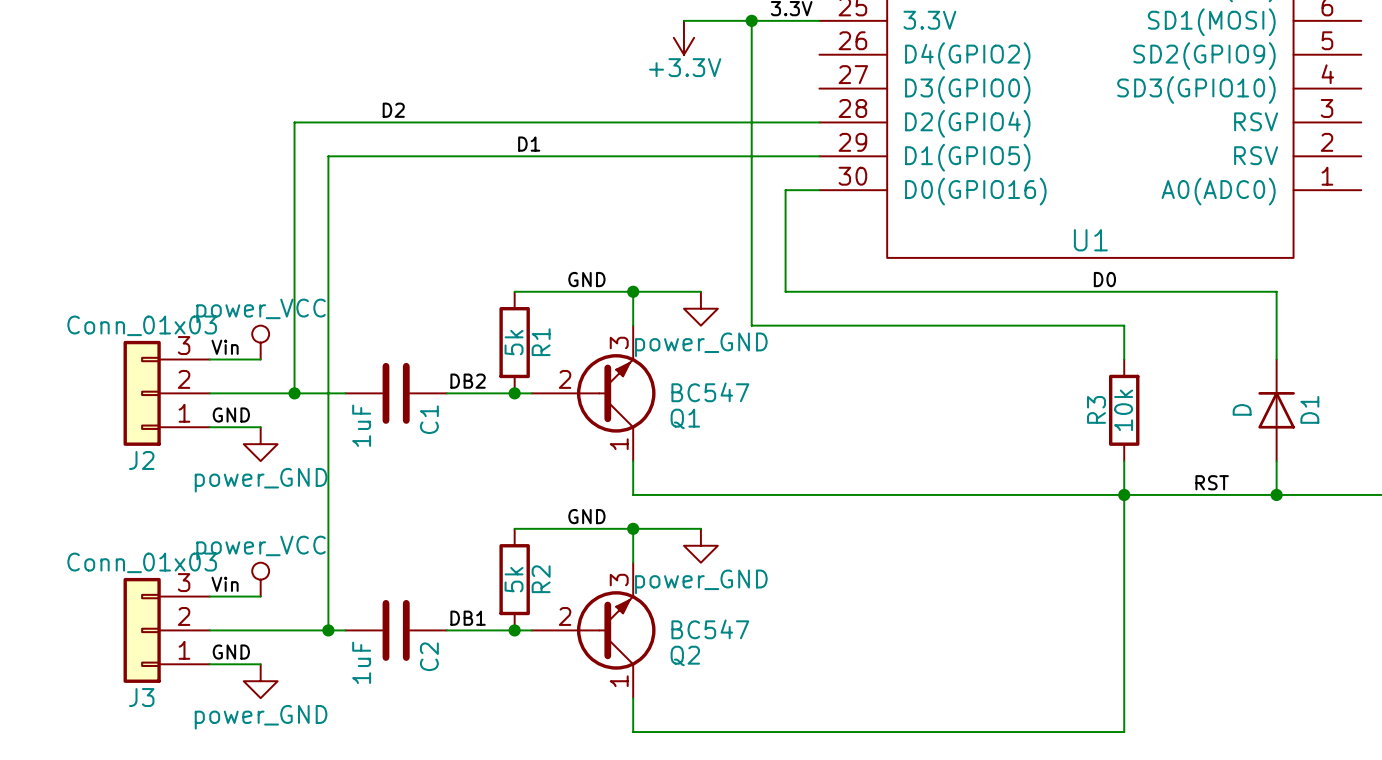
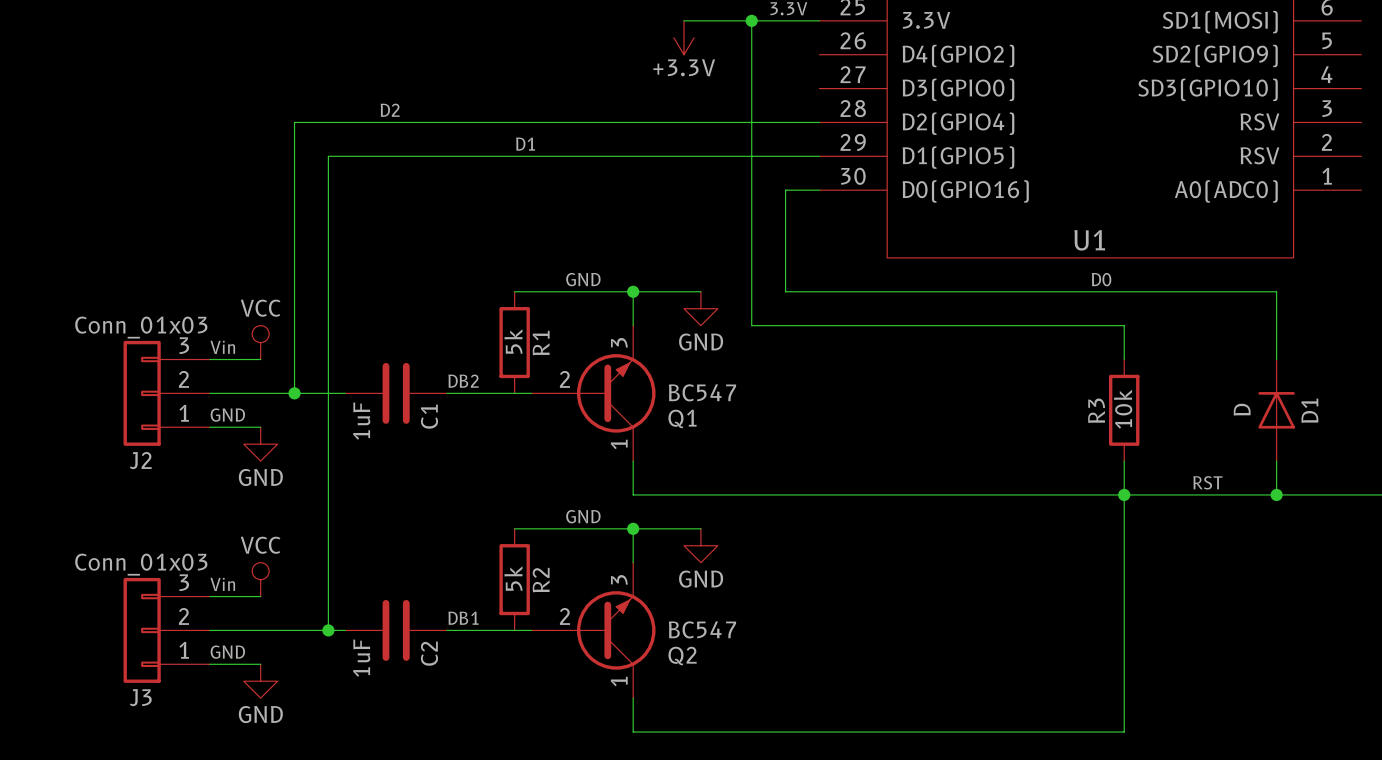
power symbol: power_GND (700, 308) -> GND (700, 308)
power symbol: power_VCC (260, 342) -> VCC (260, 342)
junction: (514, 393) -> none
power symbol: power_GND (260, 444) -> GND (260, 444)
power symbol: power_GND (700, 545) -> GND (700, 545)
power symbol: power_VCC (260, 579) -> VCC (260, 579)
junction: (514, 630) -> none
power symbol: power_GND (260, 681) -> GND (260, 681)

